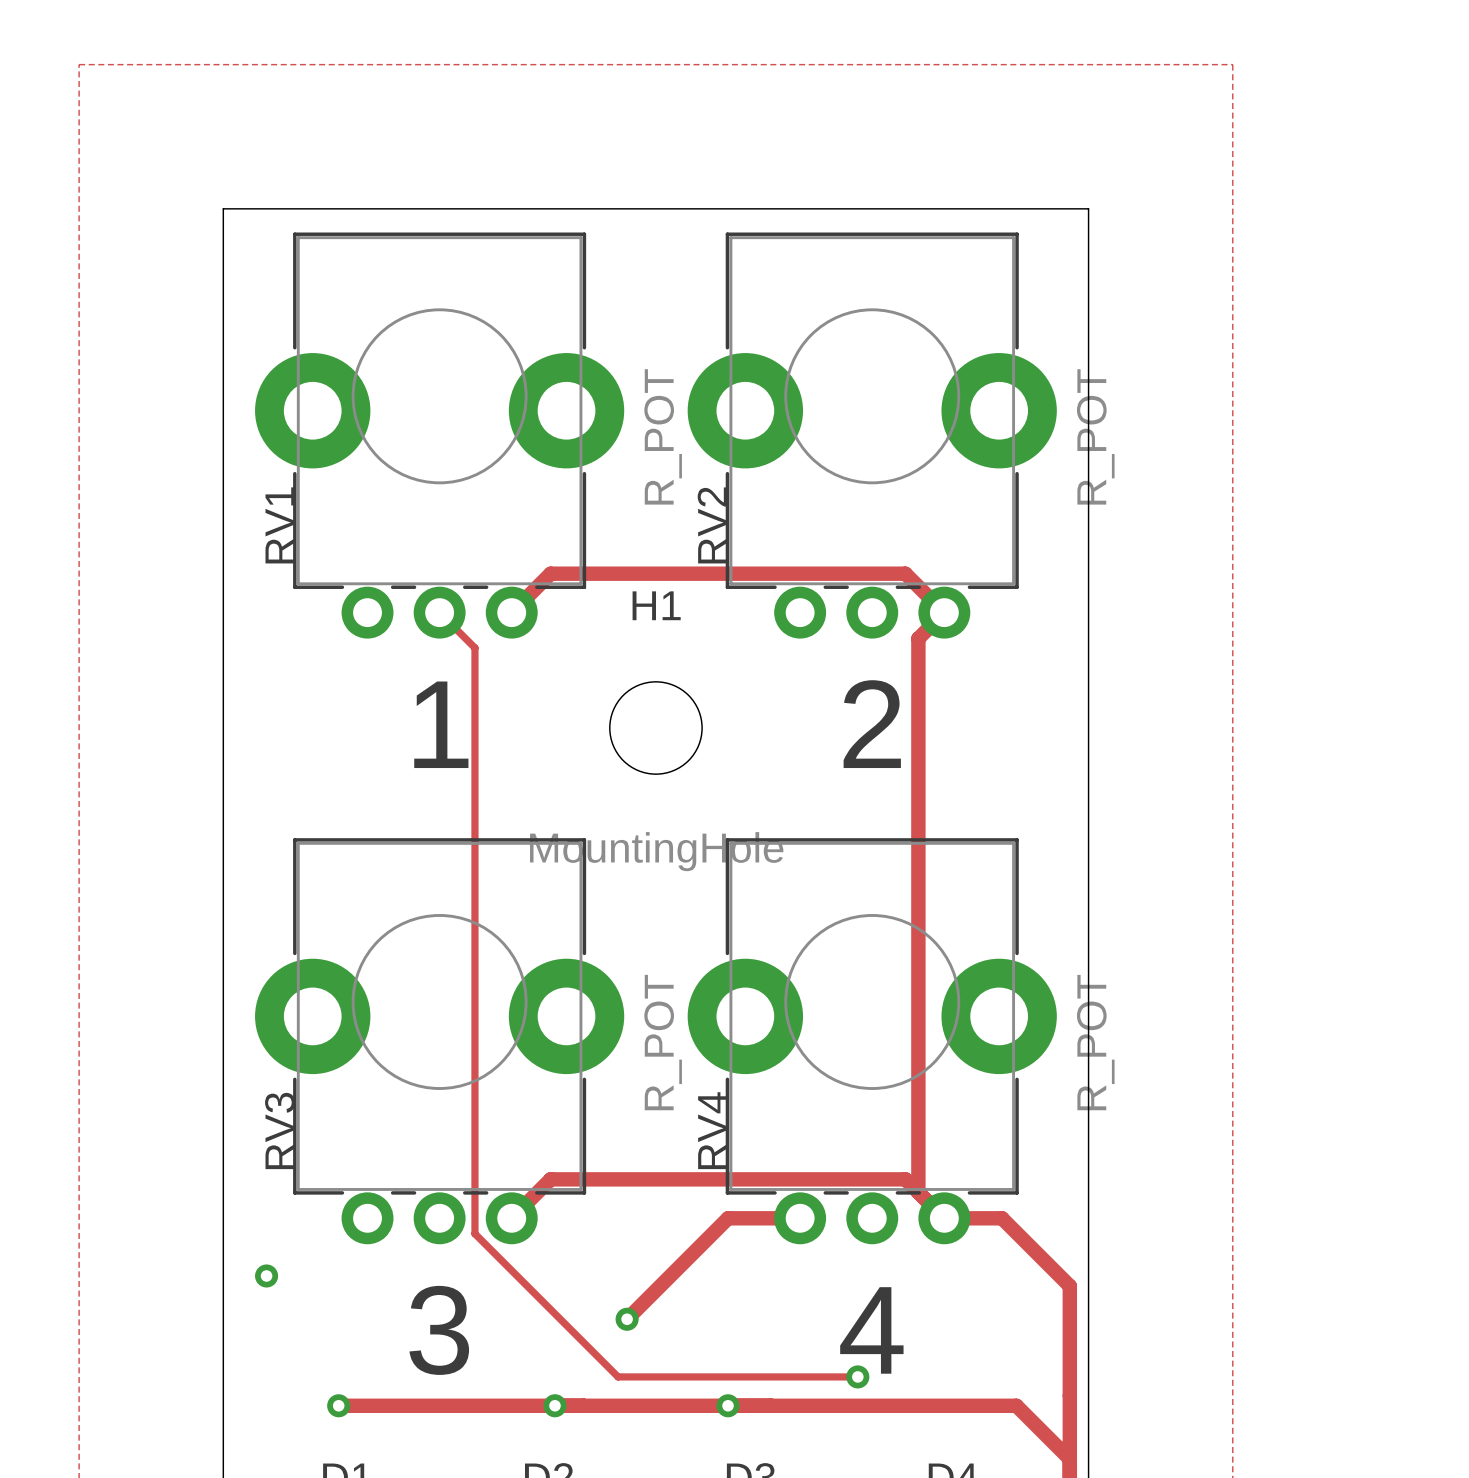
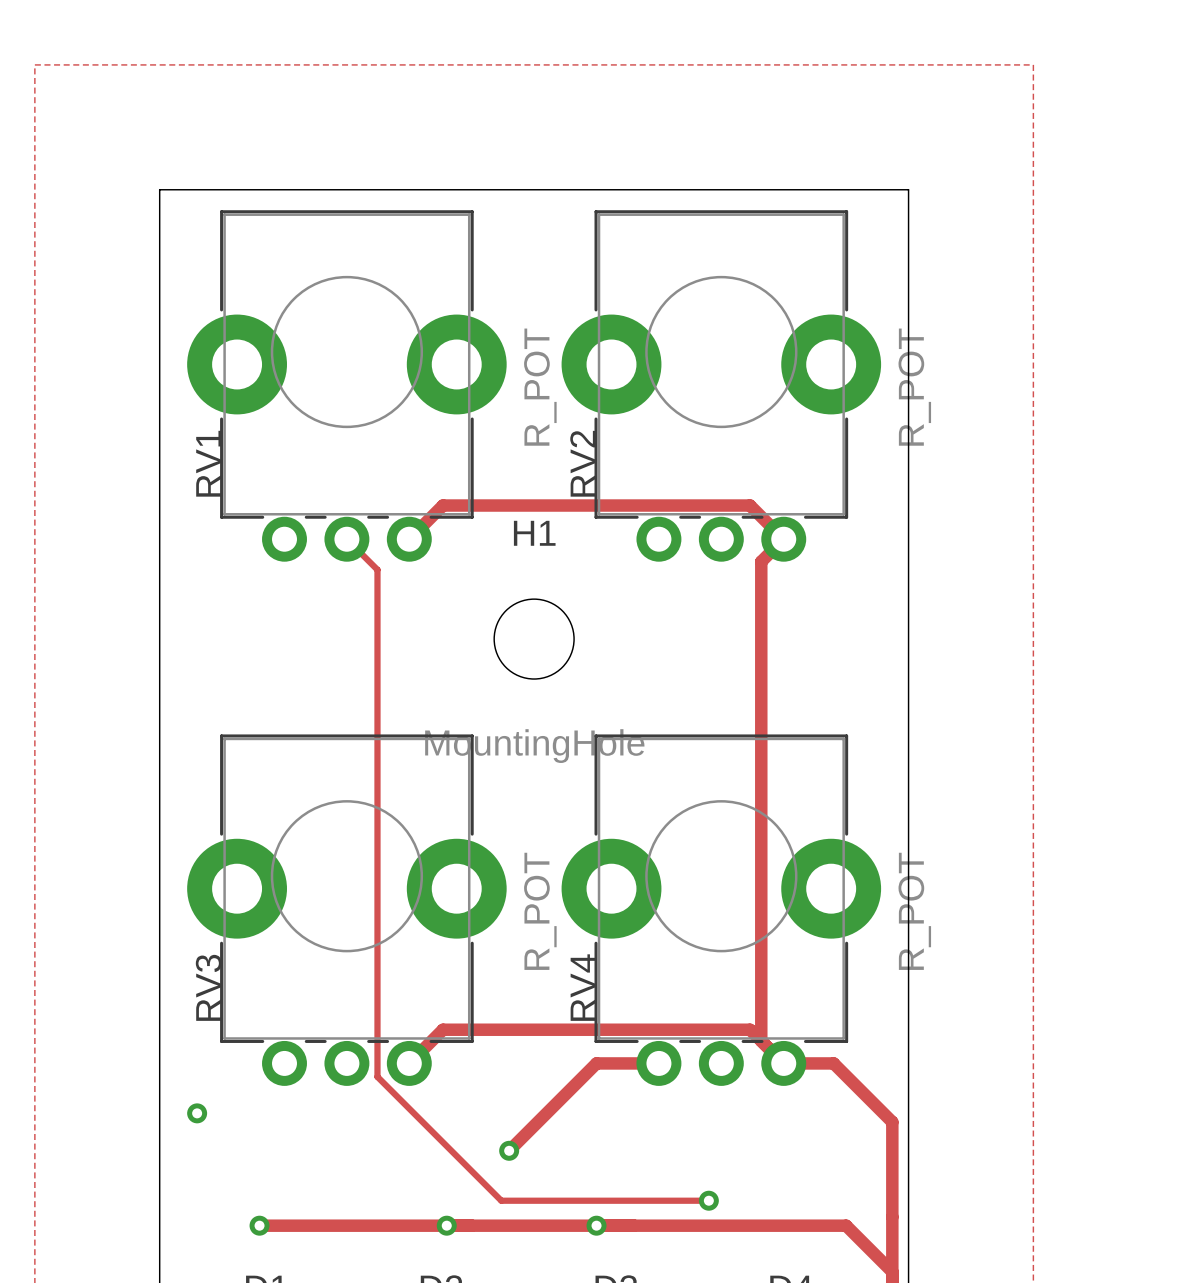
text: 1 (441, 724) -> none
text: 2 (872, 724) -> none
text: 3 (439, 1330) -> none
text: 4 (871, 1330) -> none

